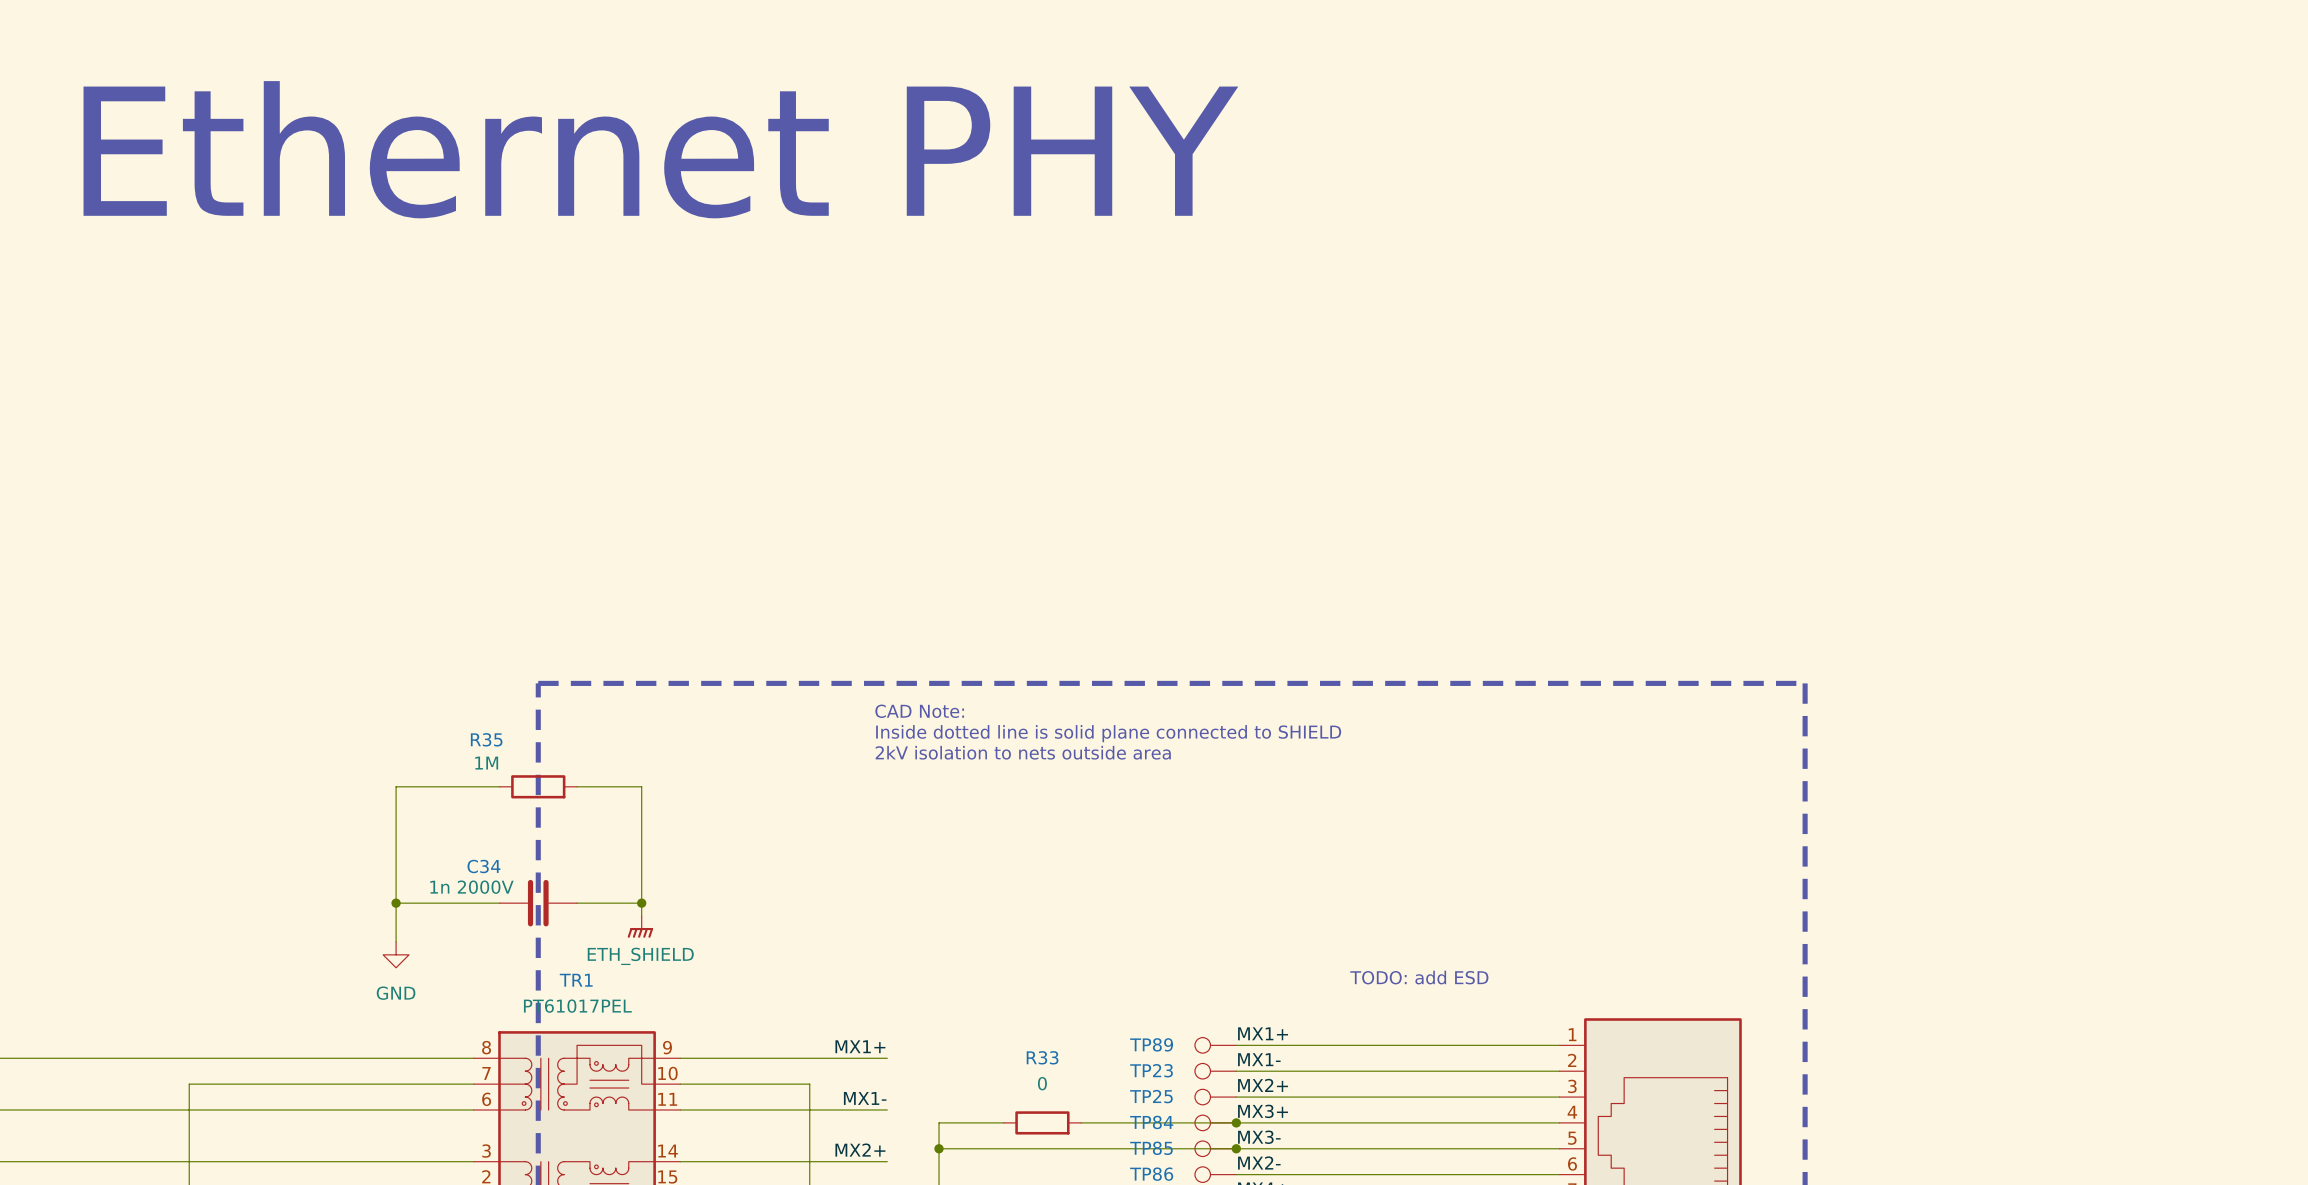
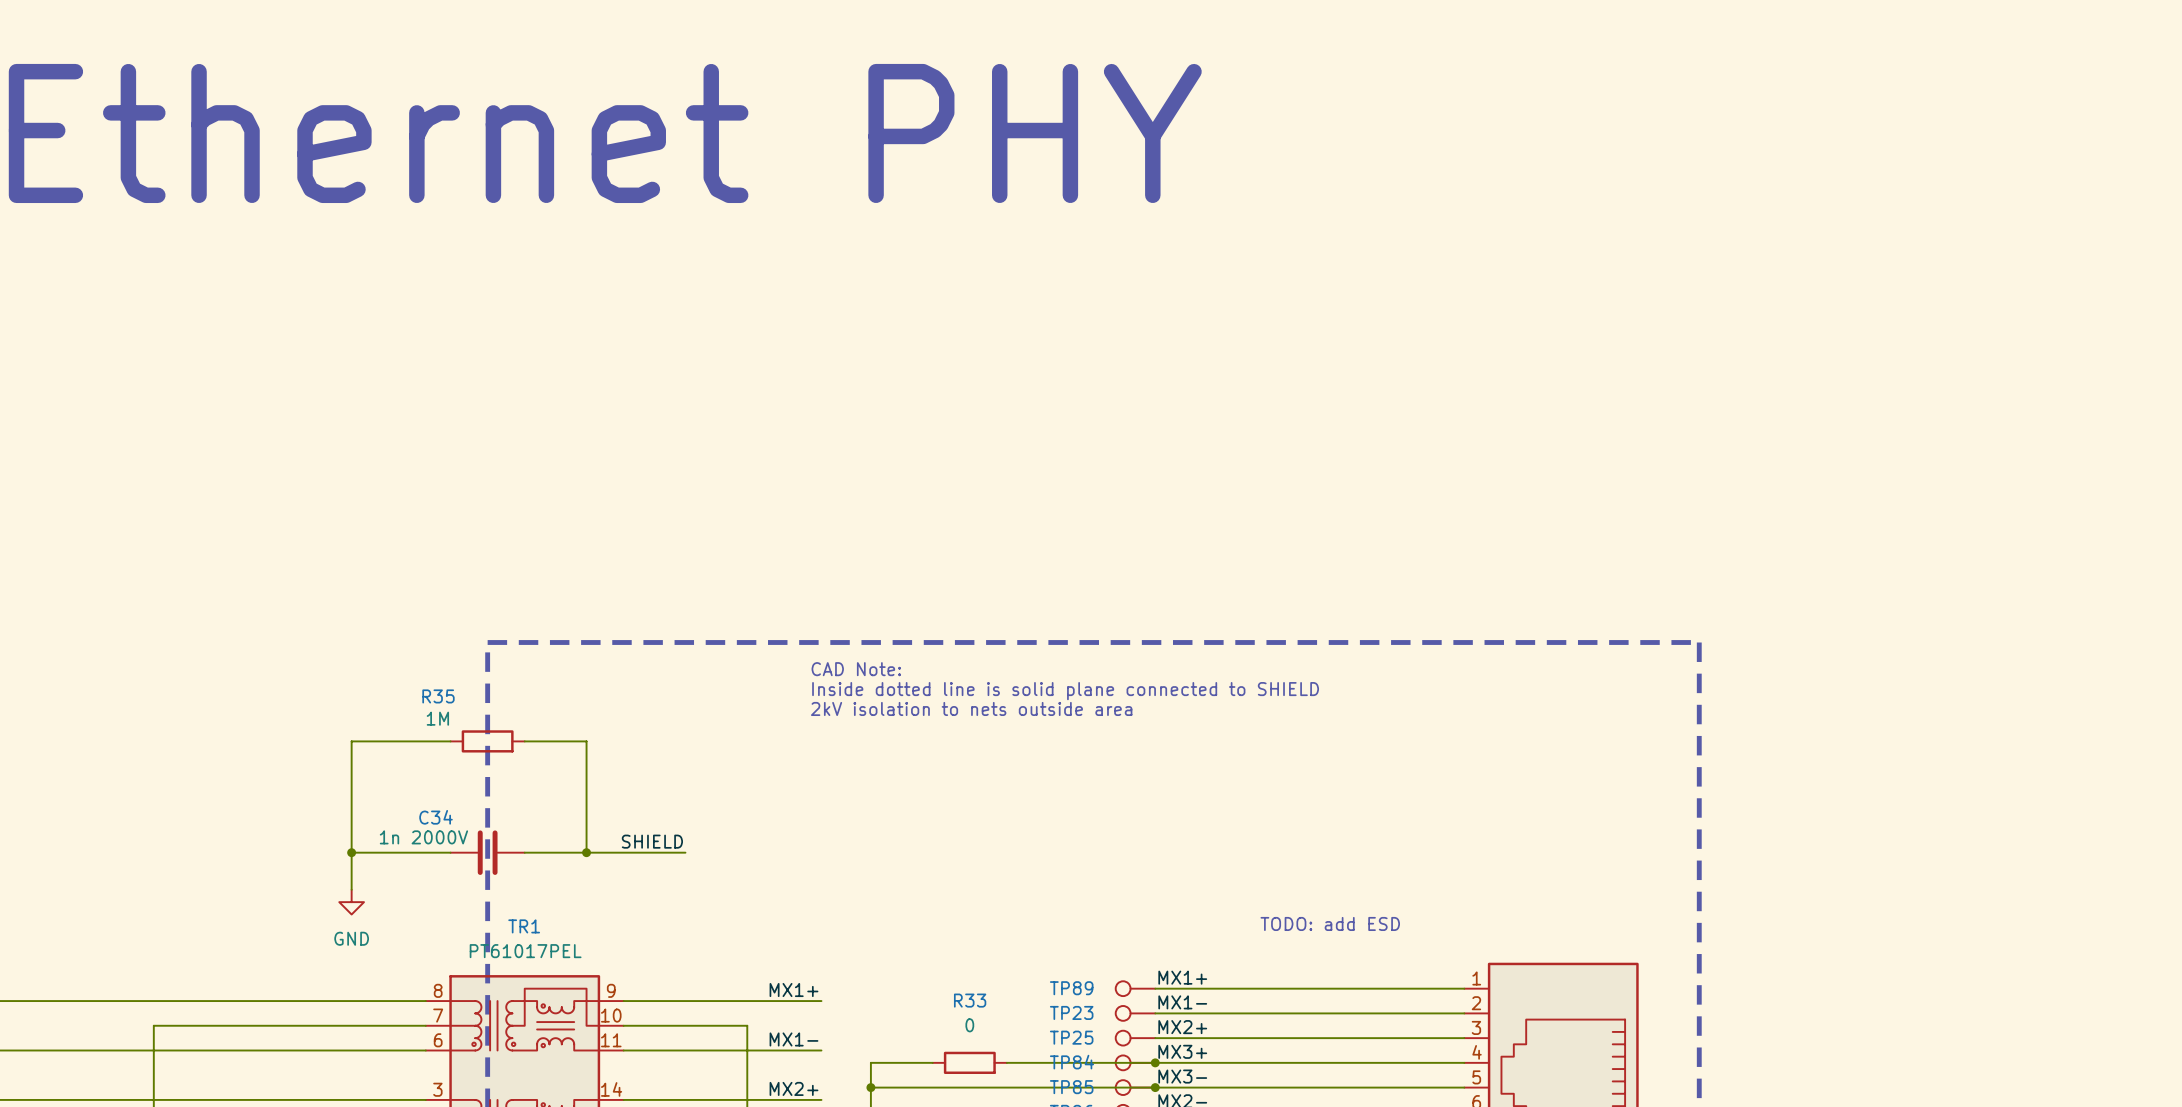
label: none -> SHIELD (652, 841)
wire: (641, 903) (641, 916) -> (586, 852) (685, 852)
power symbol: ETH_SHIELD (640, 926) -> none

